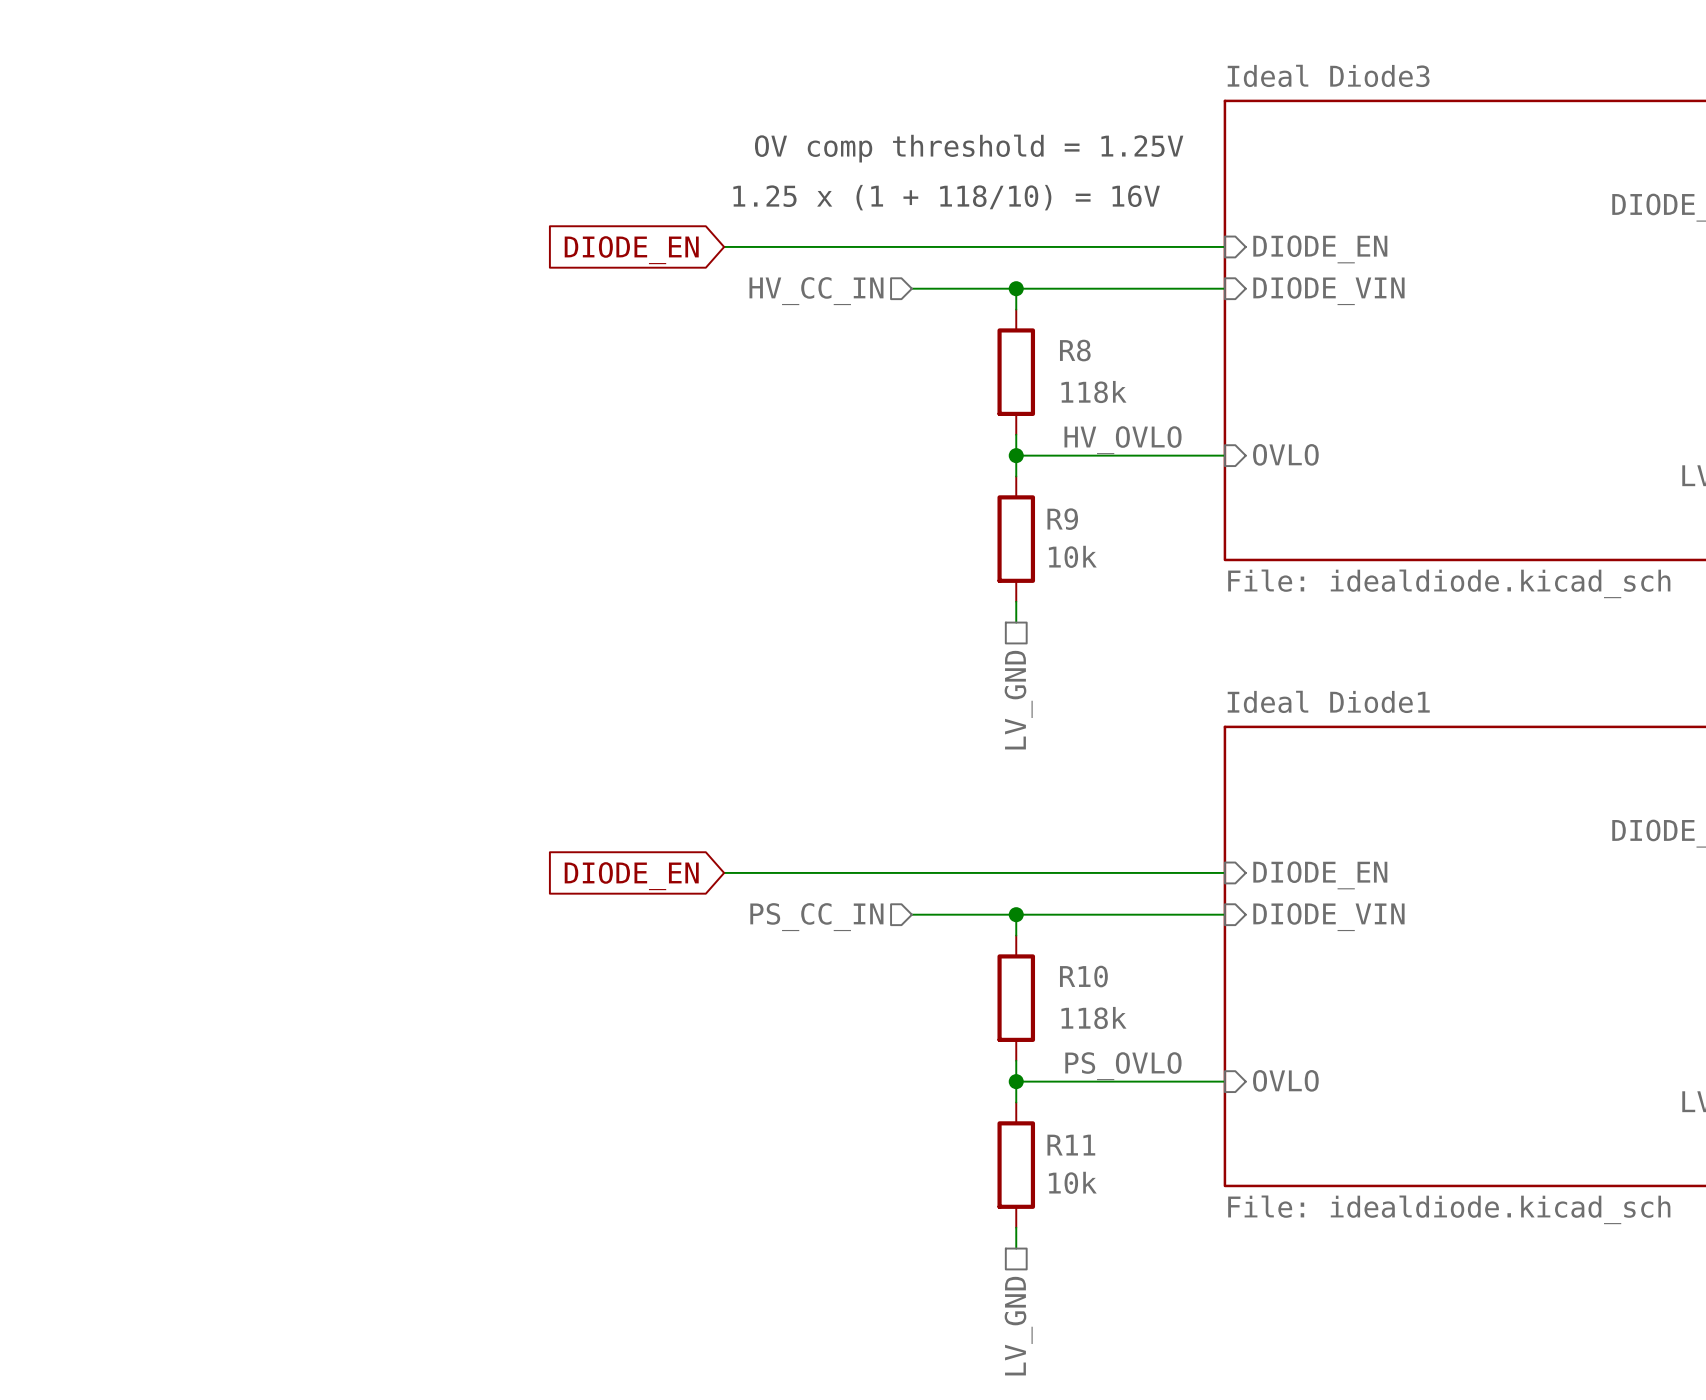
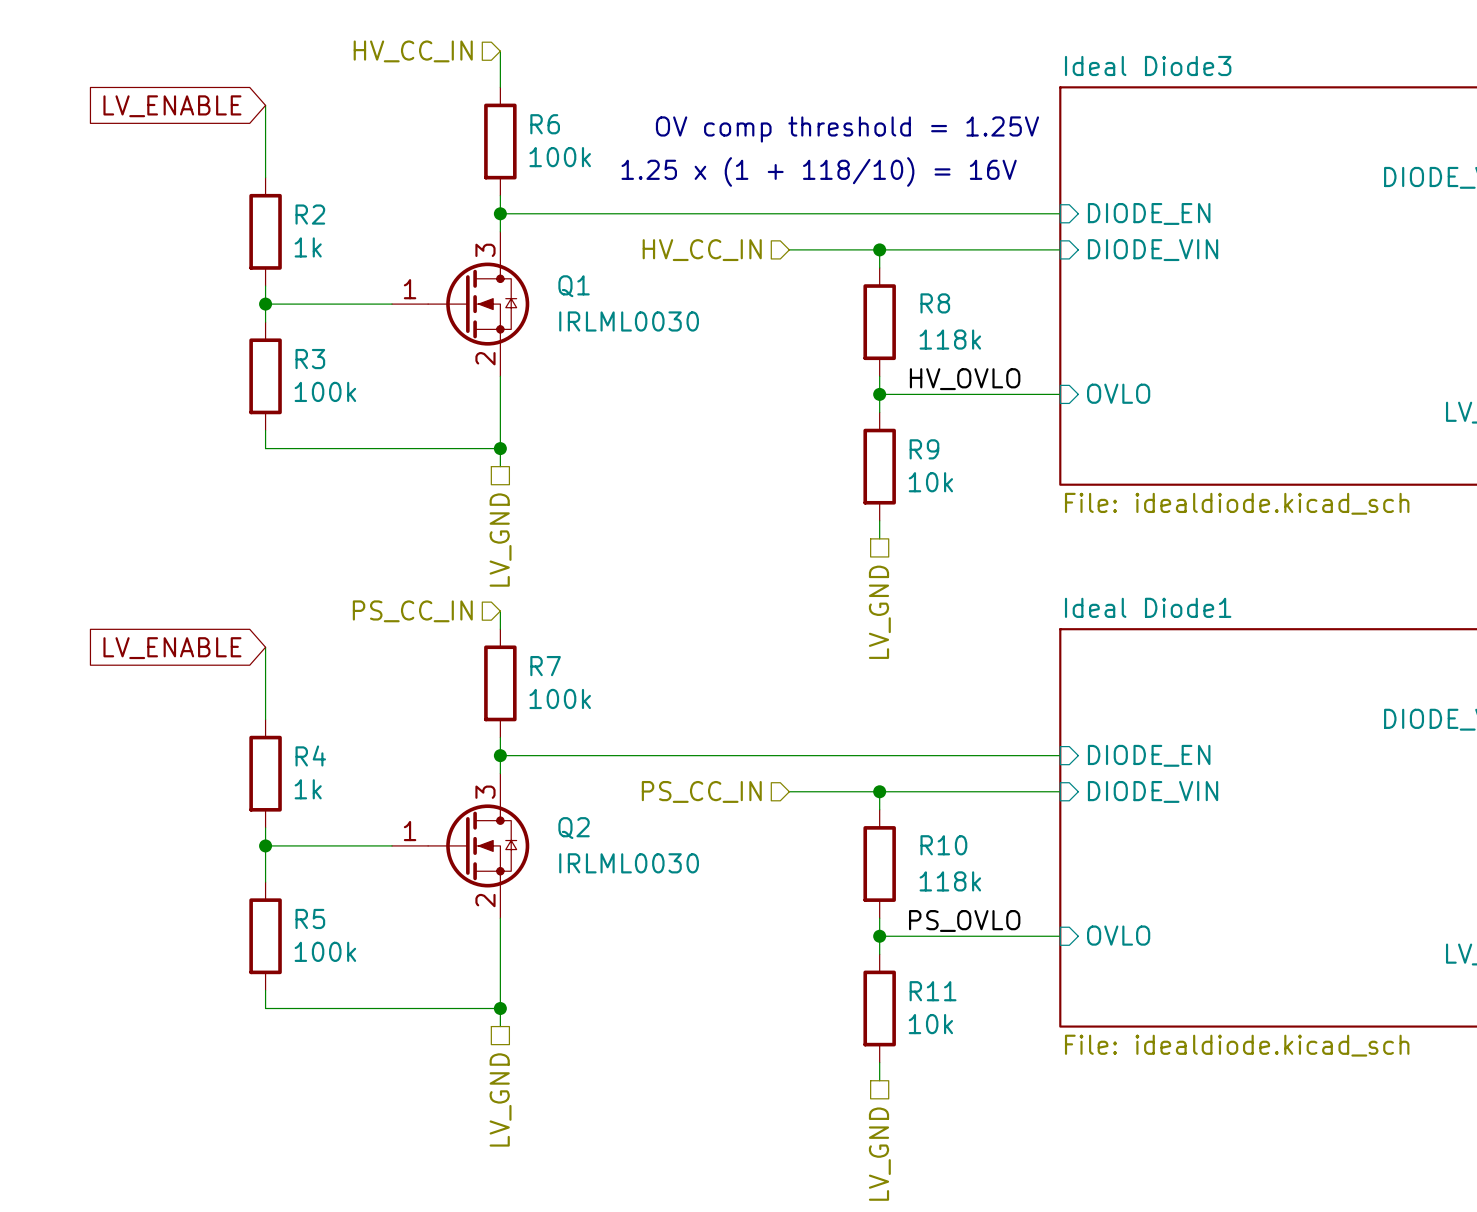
wire: none -> (500, 51) (500, 87)
hierarchical label: none -> HV_CC_IN (413, 51)
wire: none -> (265, 105) (265, 177)
global label: none -> LV_ENABLE (172, 106)
R6: none -> 100k (500, 141)
wire: none -> (500, 195) (500, 231)
wire: none -> (500, 213) (626, 213)
junction: none -> (500, 213)
global label: DIODE_EN (631, 250) -> none
R2: none -> 1k (265, 231)
wire: none -> (265, 286) (265, 322)
wire: none -> (265, 304) (392, 304)
junction: none -> (265, 304)
Q1: none -> IRLML0030 (460, 304)
R3: none -> 100k (265, 376)
wire: none -> (500, 376) (500, 466)
wire: none -> (265, 430) (265, 448) (500, 448)
junction: none -> (500, 448)
hierarchical label: none -> LV_GND (500, 540)
wire: none -> (500, 611) (500, 629)
hierarchical label: none -> PS_CC_IN (412, 611)
wire: none -> (265, 647) (265, 719)
global label: none -> LV_ENABLE (172, 648)
R7: none -> 100k (500, 683)
wire: none -> (500, 737) (500, 773)
wire: none -> (500, 755) (626, 755)
junction: none -> (500, 755)
global label: DIODE_EN (631, 876) -> none
R4: none -> 1k (265, 773)
wire: none -> (265, 827) (265, 882)
wire: none -> (265, 845) (392, 845)
junction: none -> (265, 845)
Q2: none -> IRLML0030 (460, 845)
wire: none -> (500, 918) (500, 1026)
R5: none -> 100k (265, 936)
wire: none -> (265, 990) (265, 1008) (500, 1008)
junction: none -> (500, 1008)
hierarchical label: none -> LV_GND (500, 1099)

